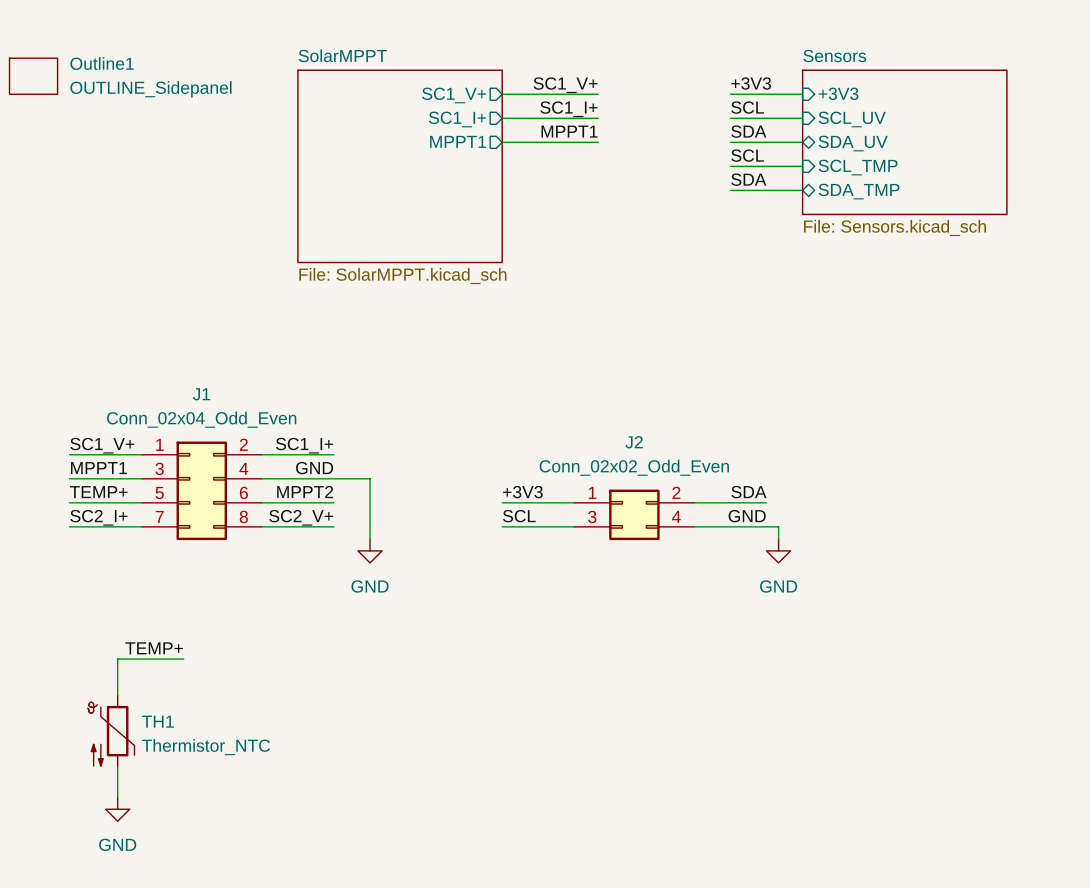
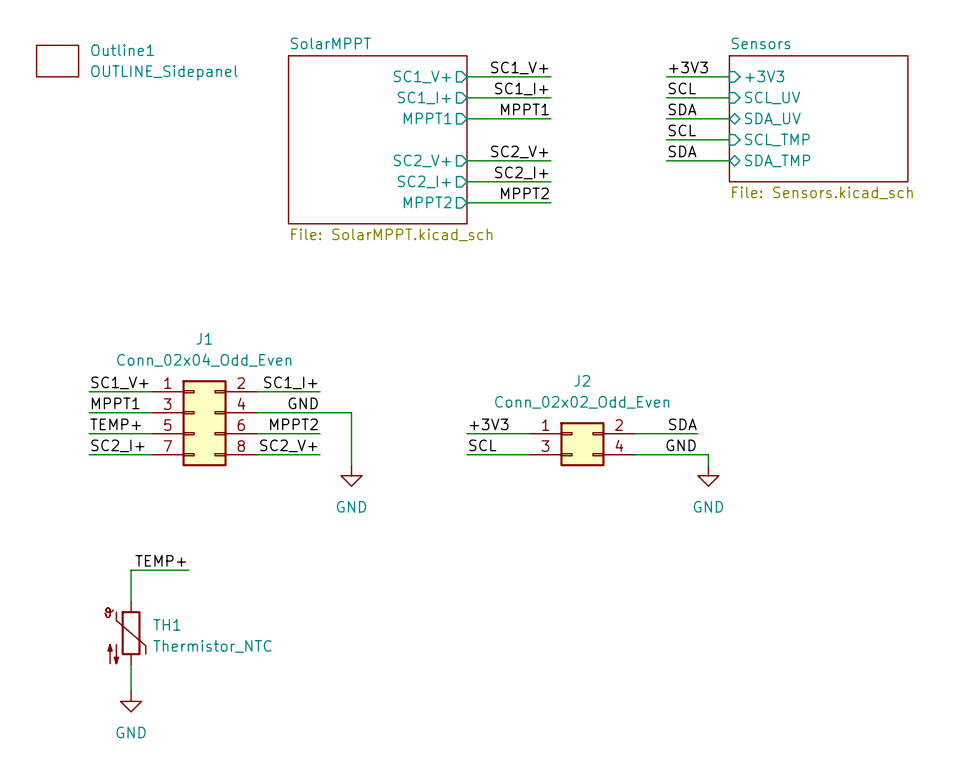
label: none -> SC2_V+ (519, 151)
wire: none -> (466, 160) (550, 160)
sheet pin: none -> SC2_V+ (422, 160)
label: none -> SC2_I+ (521, 172)
wire: none -> (466, 181) (550, 181)
sheet pin: none -> SC2_I+ (424, 181)
label: none -> MPPT2 (524, 193)
sheet pin: none -> MPPT2 (427, 202)
wire: none -> (466, 202) (550, 202)

